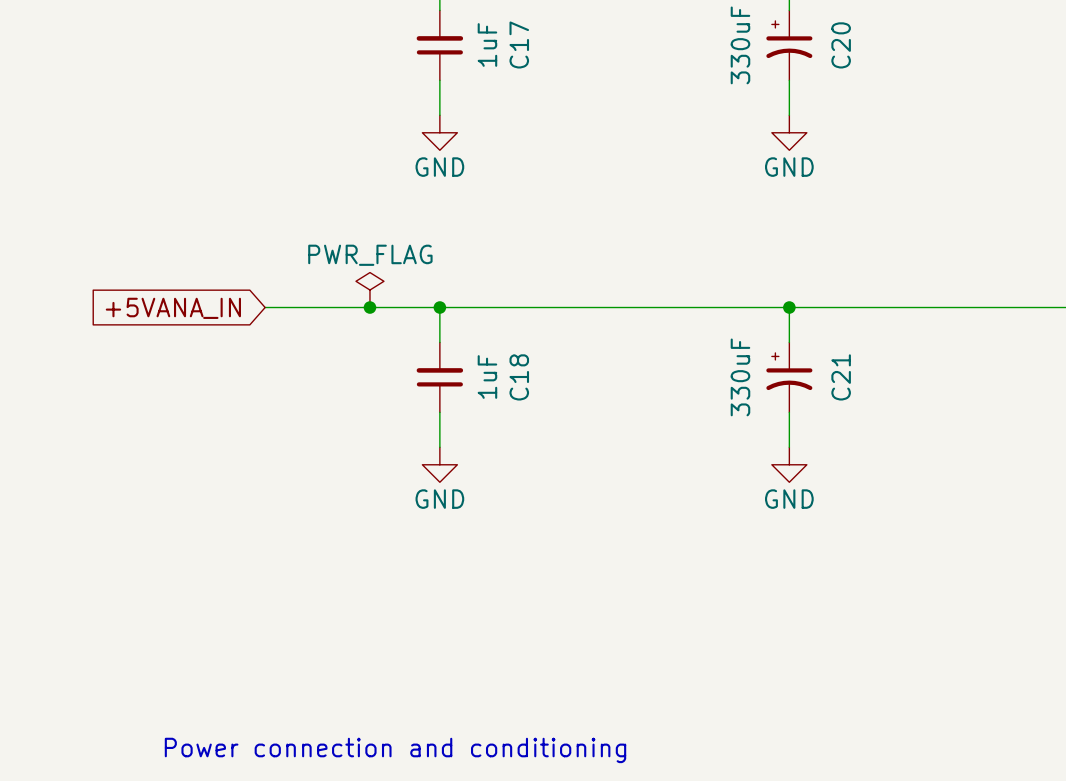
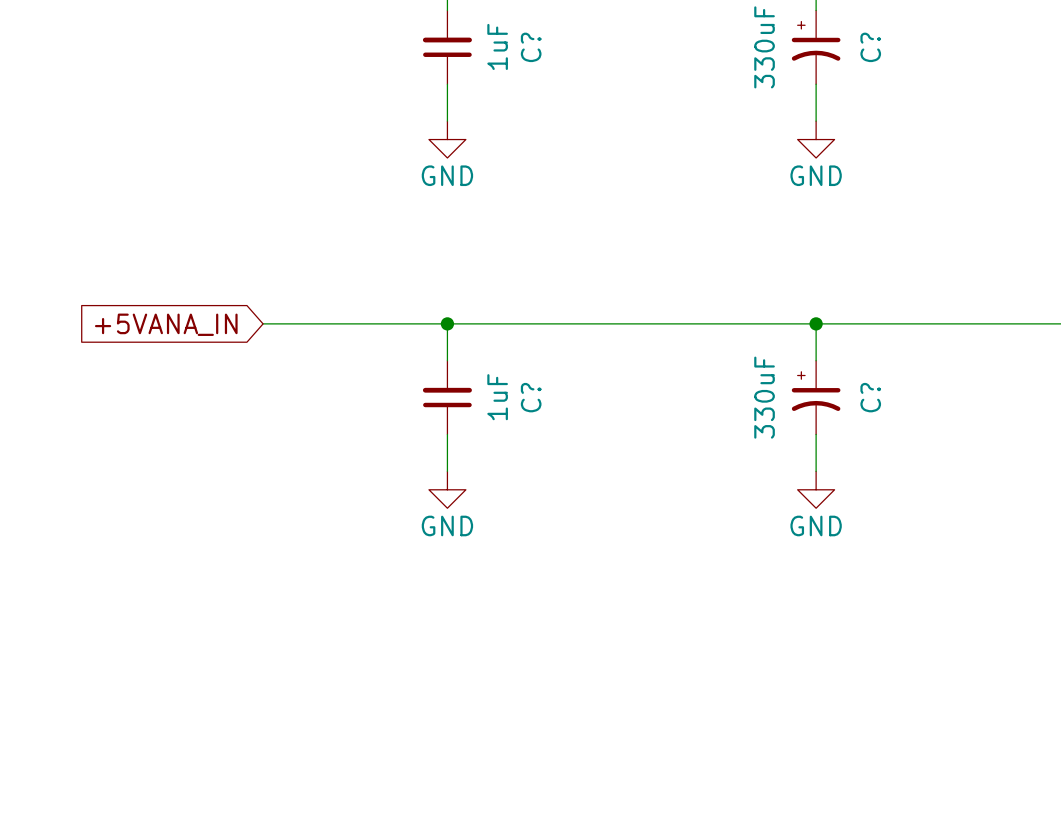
C17 name: C17 (519, 44) -> C? (531, 47)
C20 name: C20 (841, 45) -> C? (870, 47)
power symbol: PWR_FLAG (369, 290) -> none
junction: (369, 307) -> none
C18 name: C18 (519, 377) -> C? (531, 397)
C21 name: C21 (841, 377) -> C? (870, 397)
text: Power connection and conditioning (395, 750) -> none

